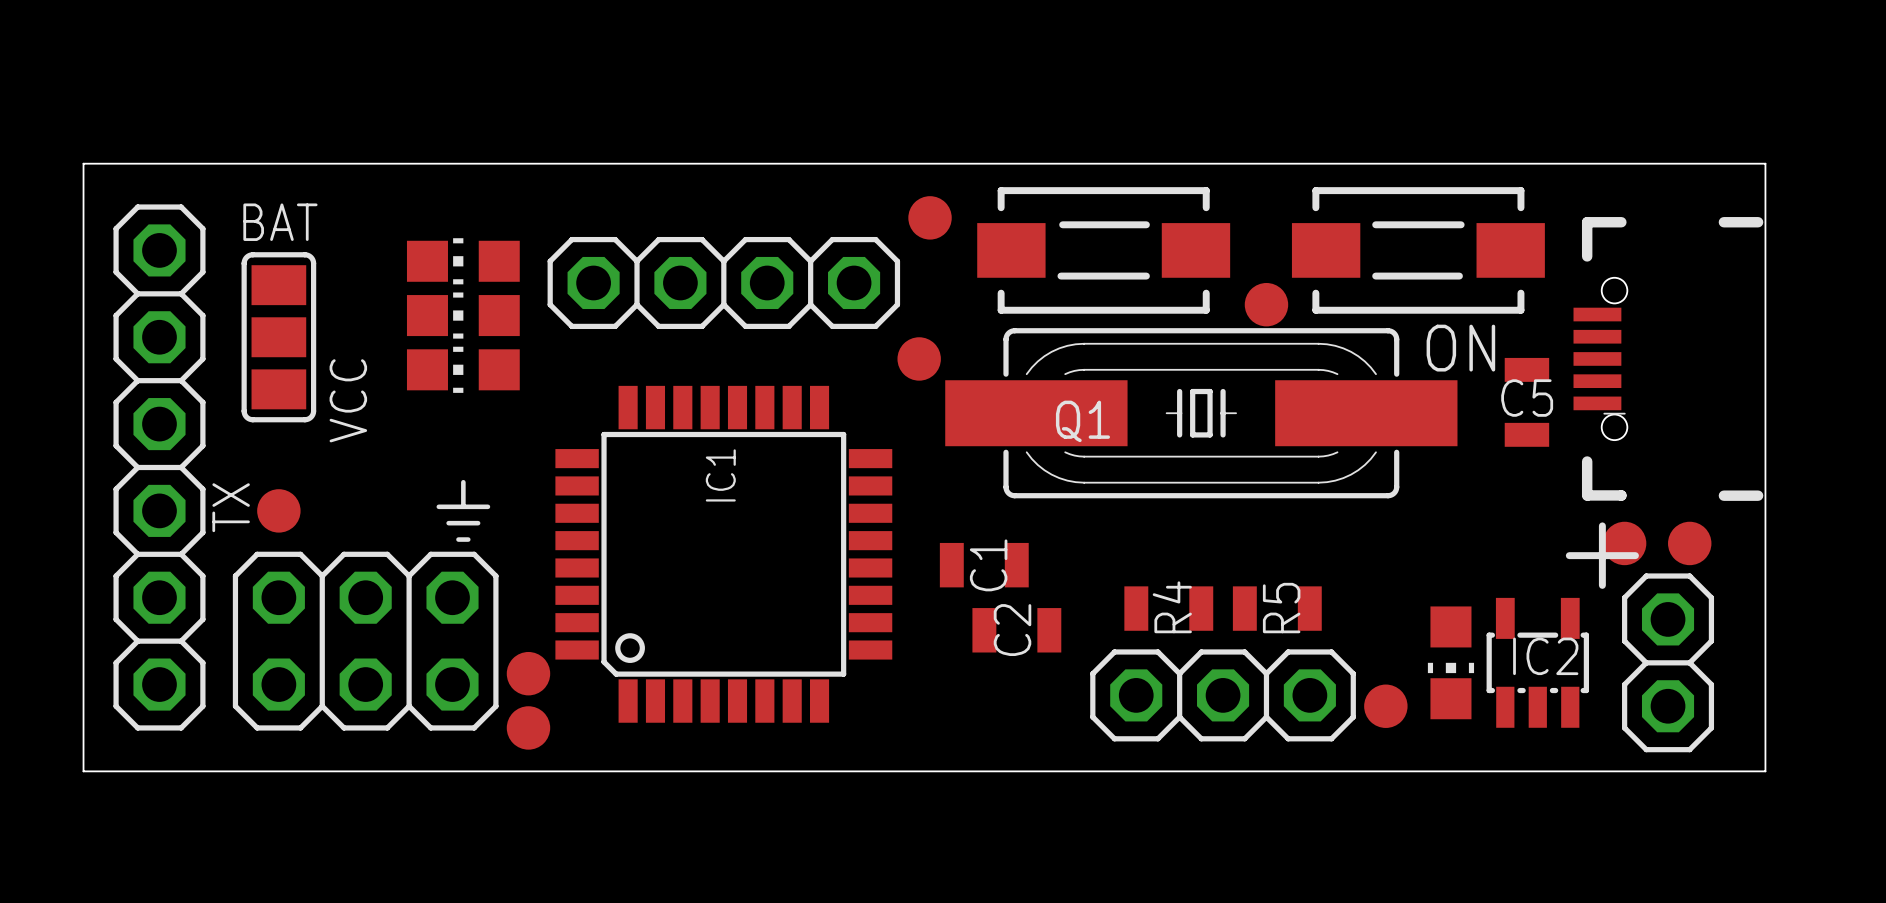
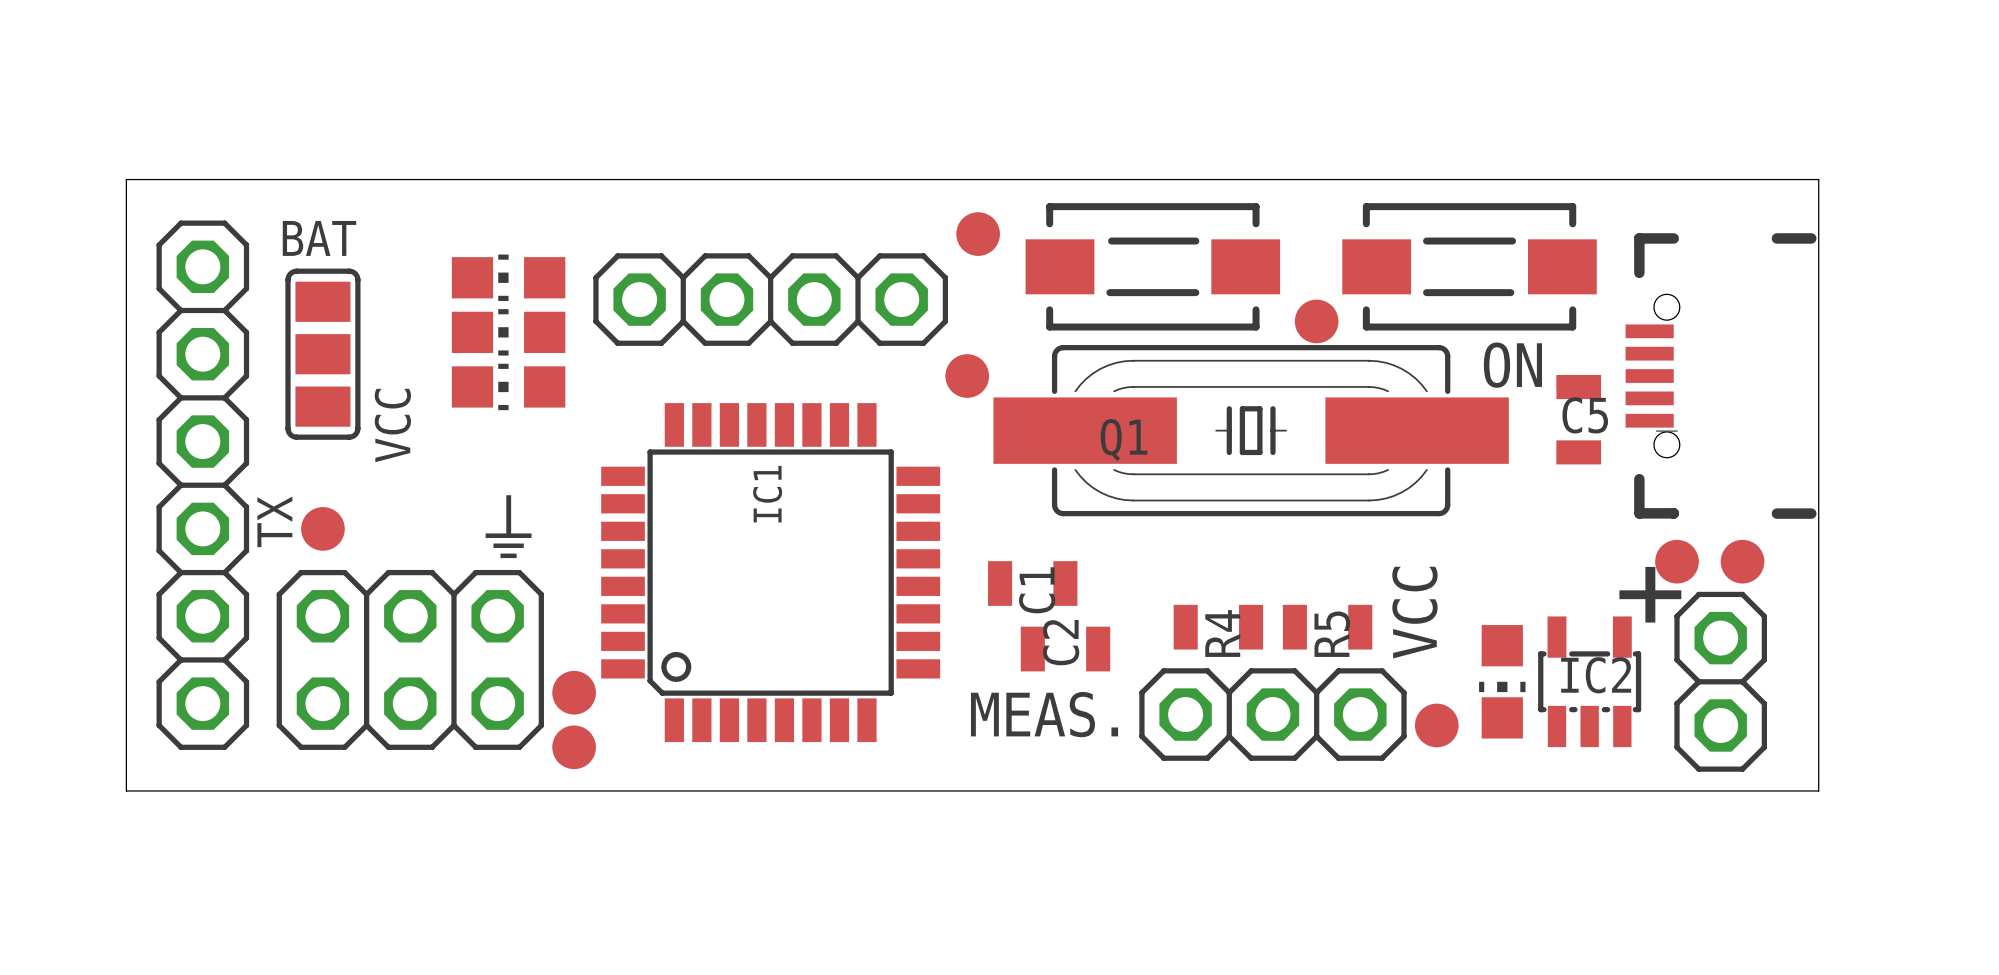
text: none -> VCC (1414, 612)
text: none -> MEAS. (1044, 714)

